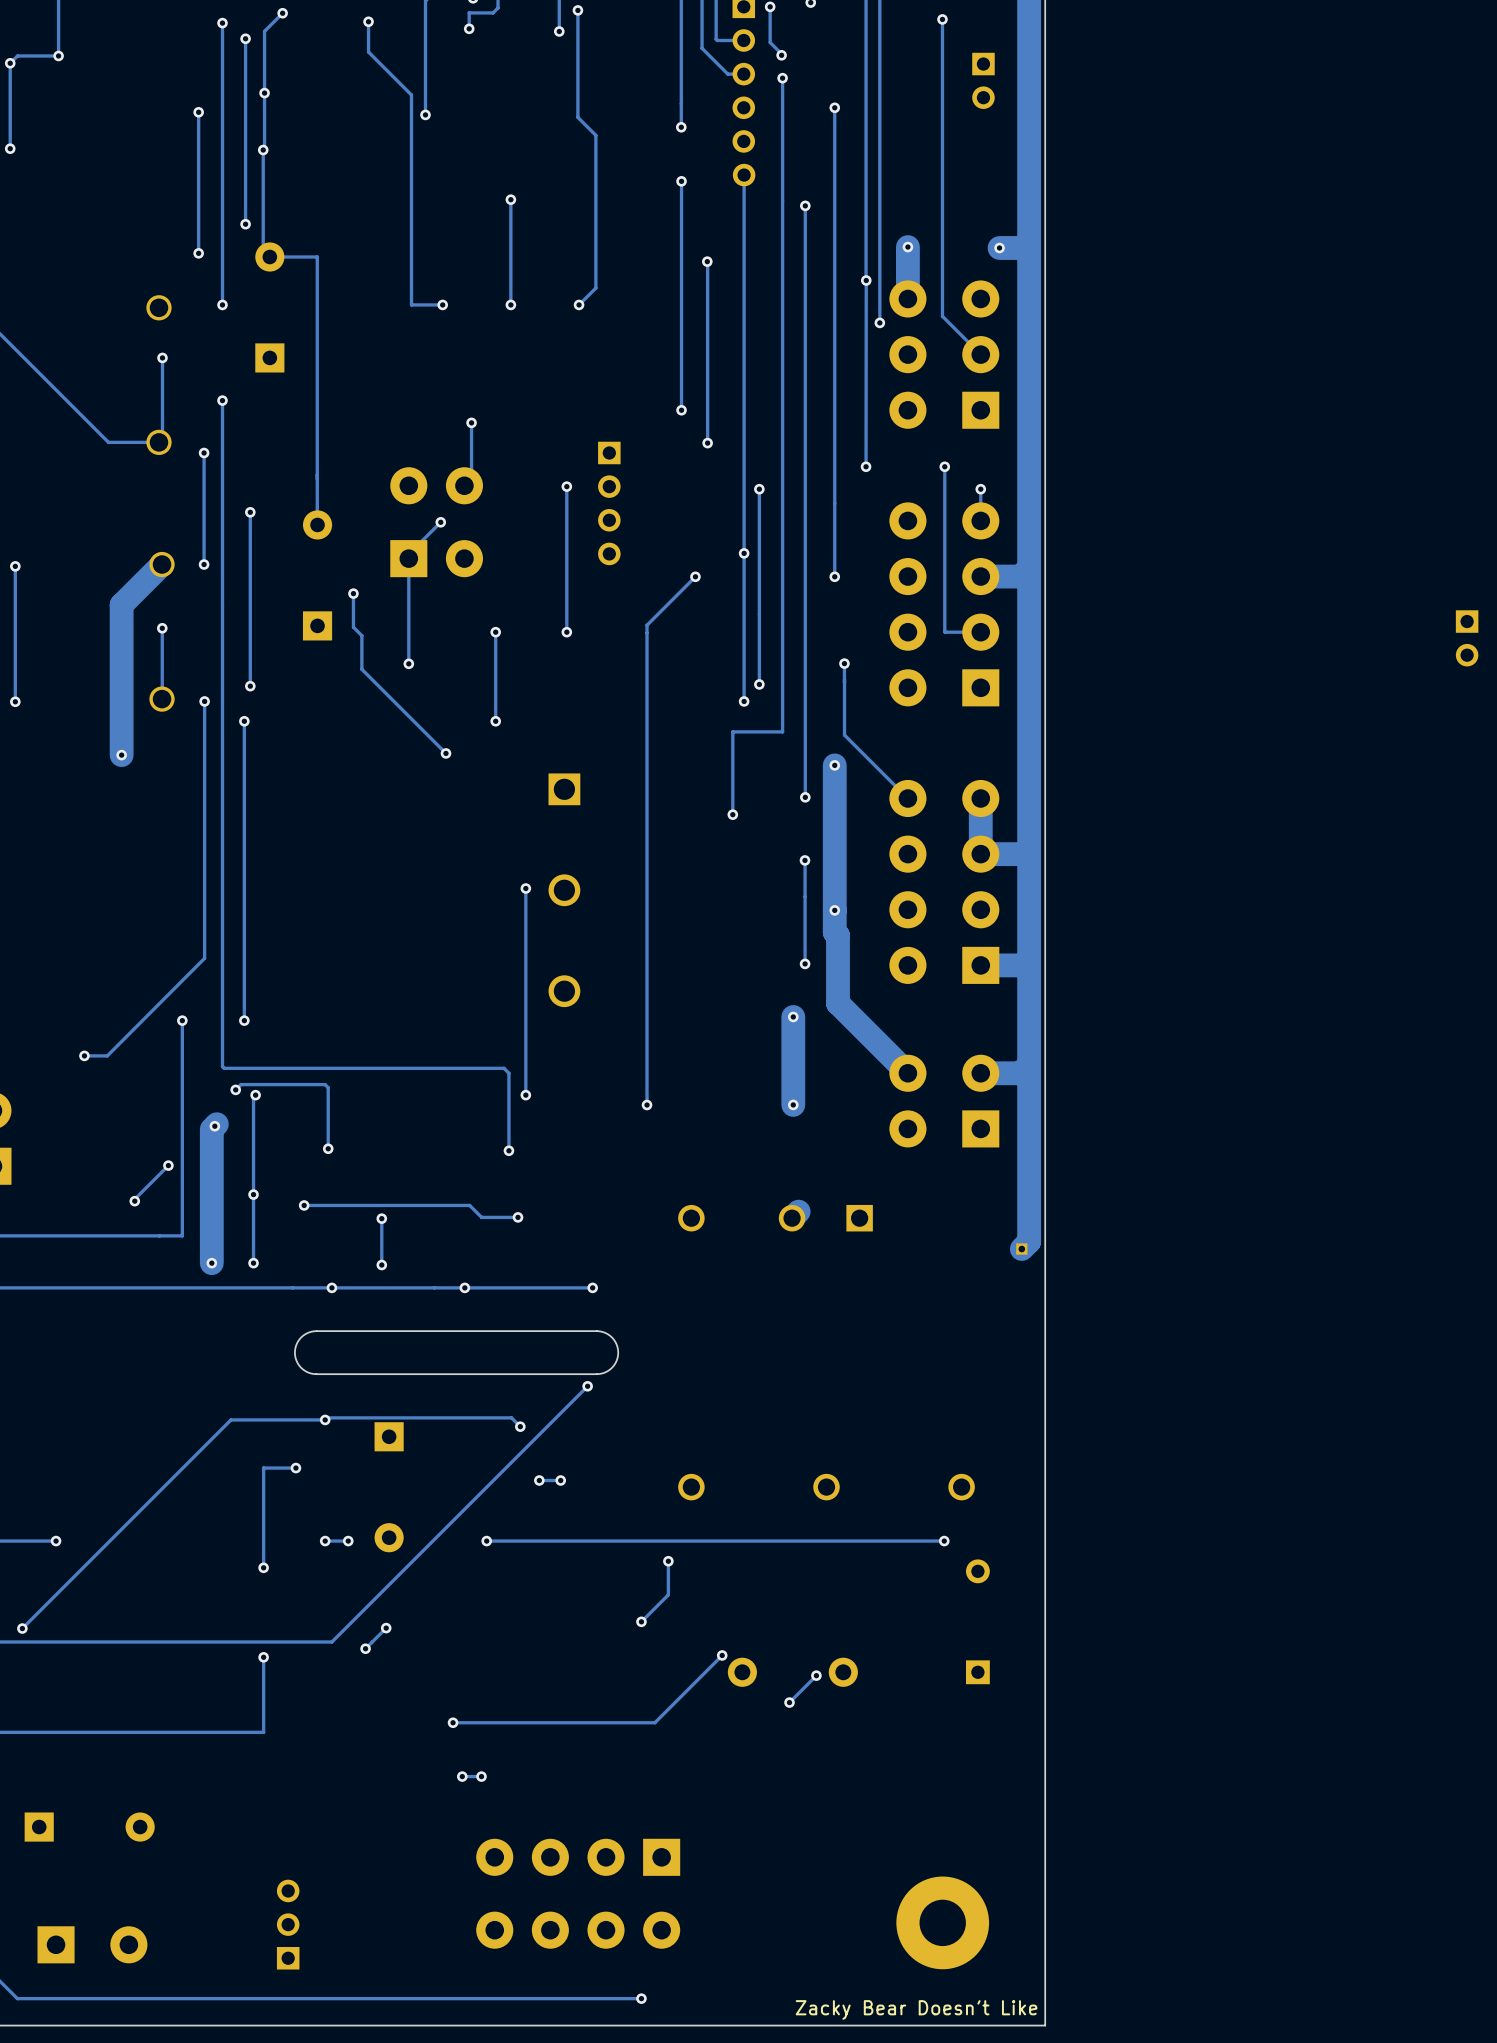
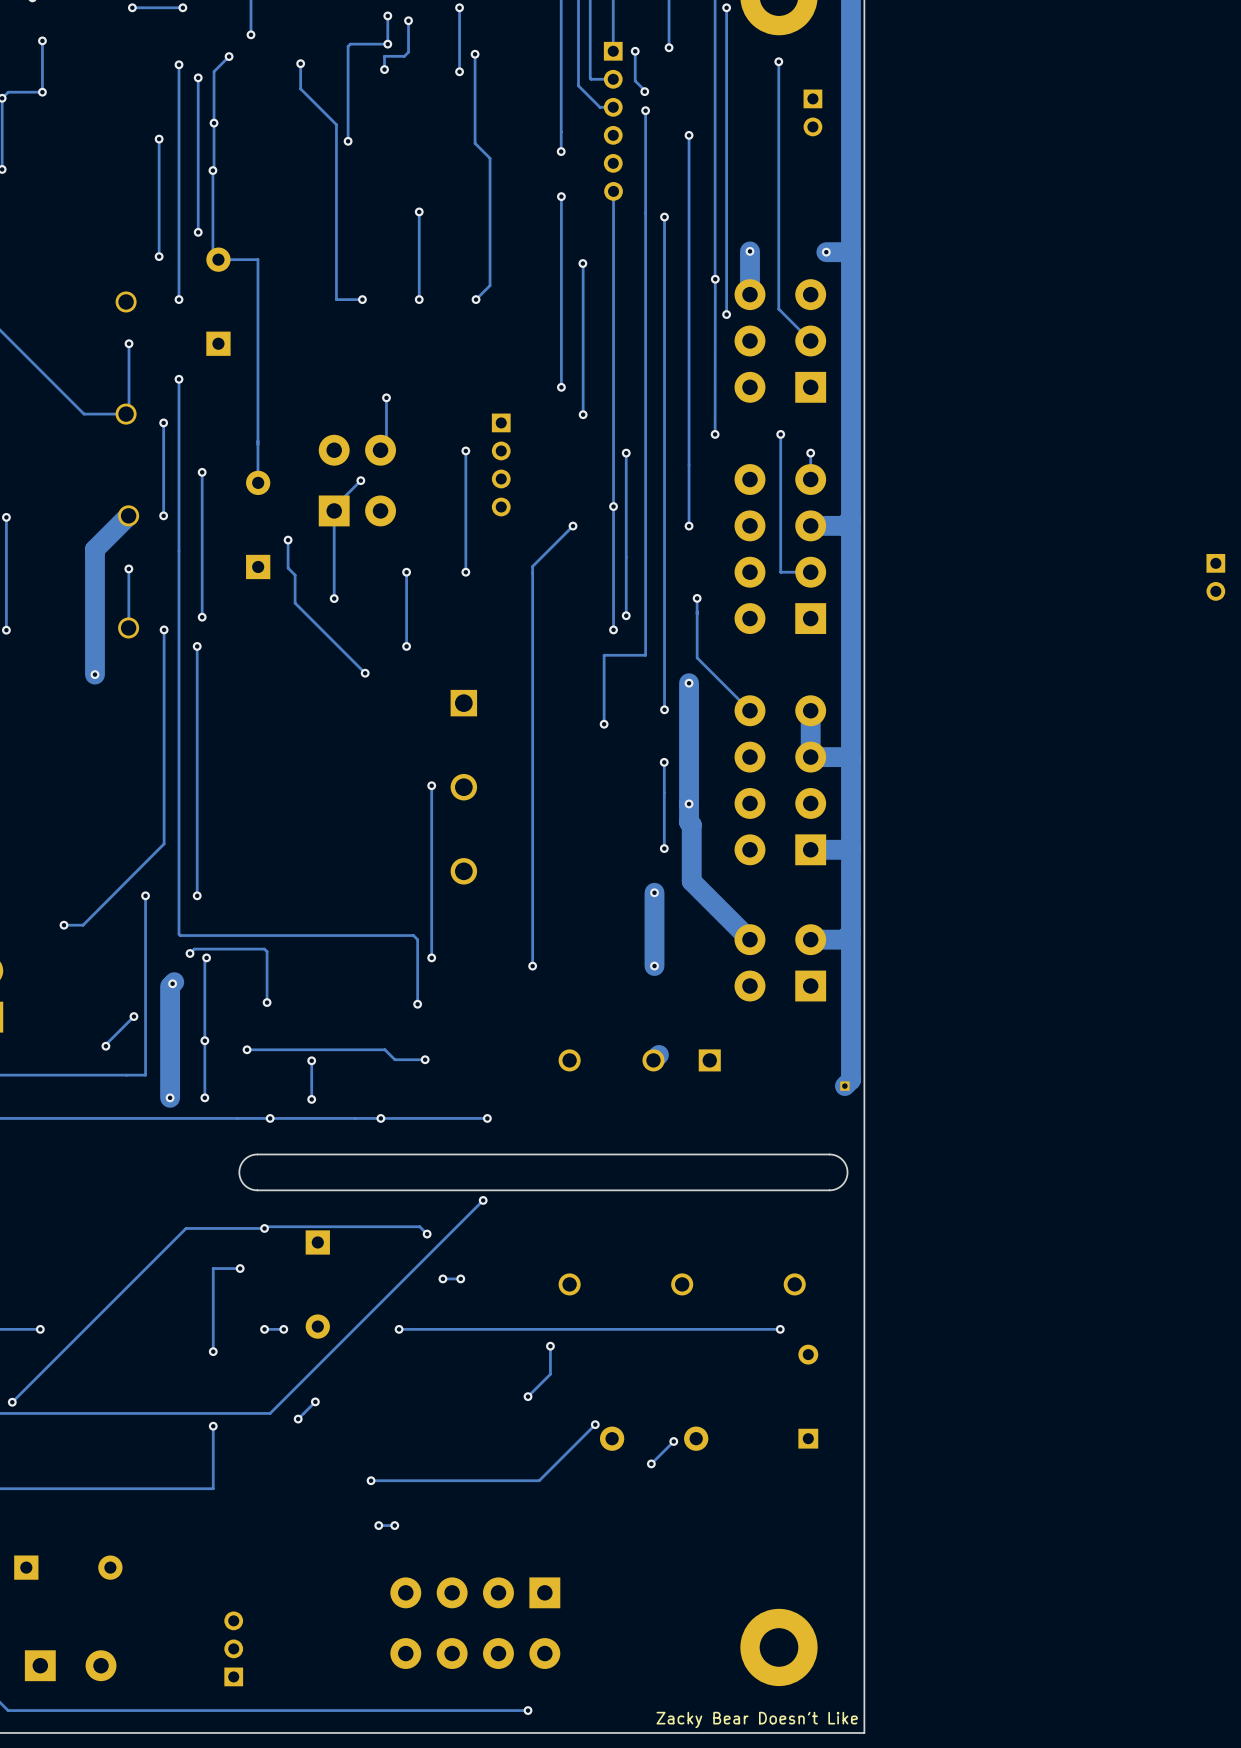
board edge: (596, 1331) (604, 1332) (611, 1337) (616, 1344) (618, 1352) (616, 1360) (611, 1367) (604, 1372) (596, 1374) -> (491, 1154) (829, 1154) (842, 1159) (847, 1172) (842, 1185) (829, 1190) (490, 1190)

